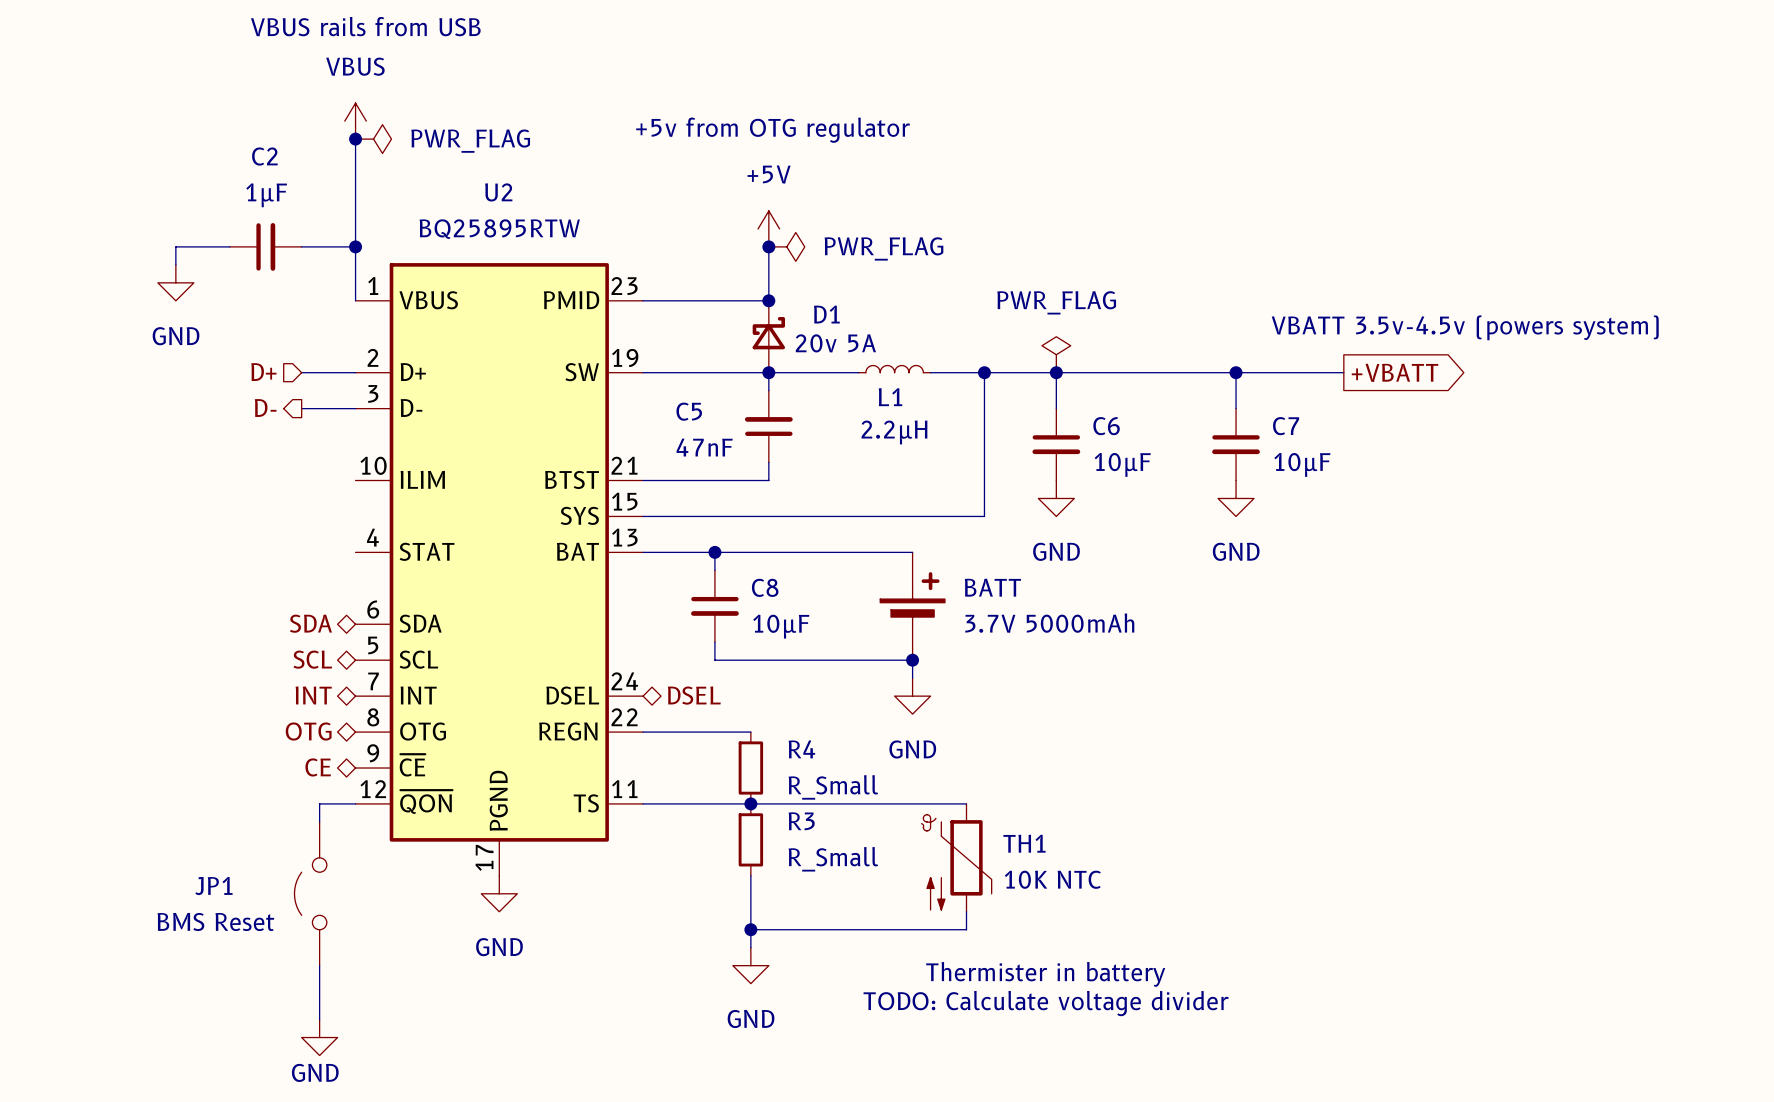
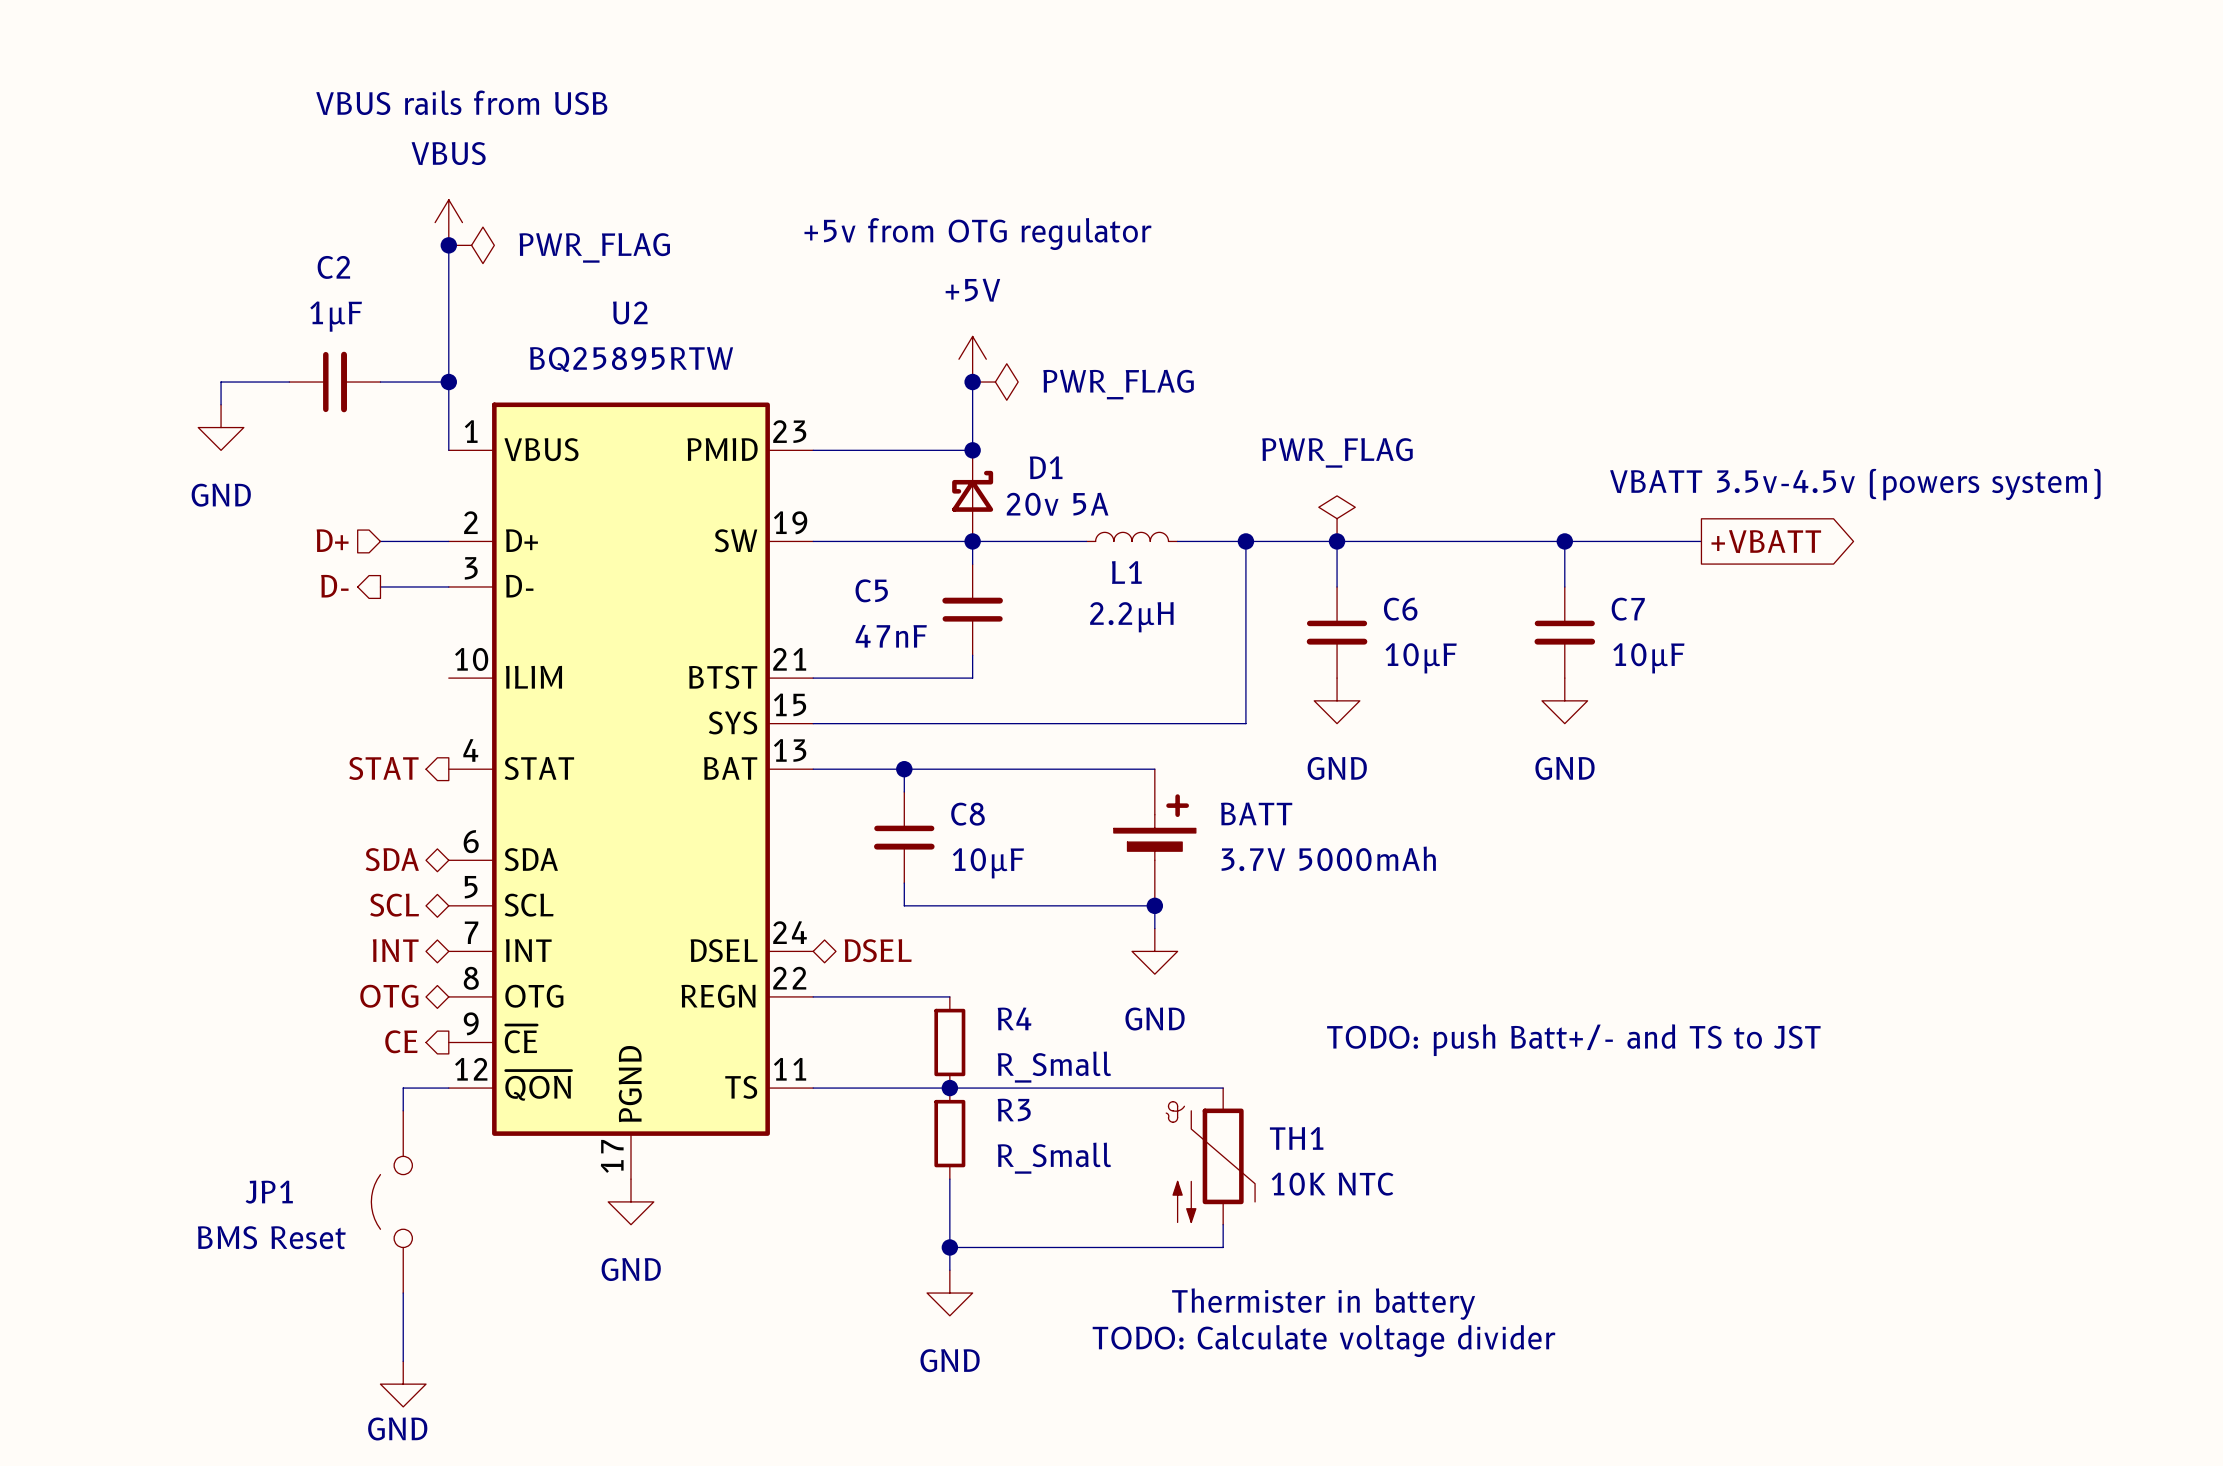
hierarchical label: none -> STAT (383, 768)
text: none -> TODO: push Batt+/- and TS to JST (1573, 1040)
hierarchical label shape: bidirectional (318, 767) -> output (401, 1041)

